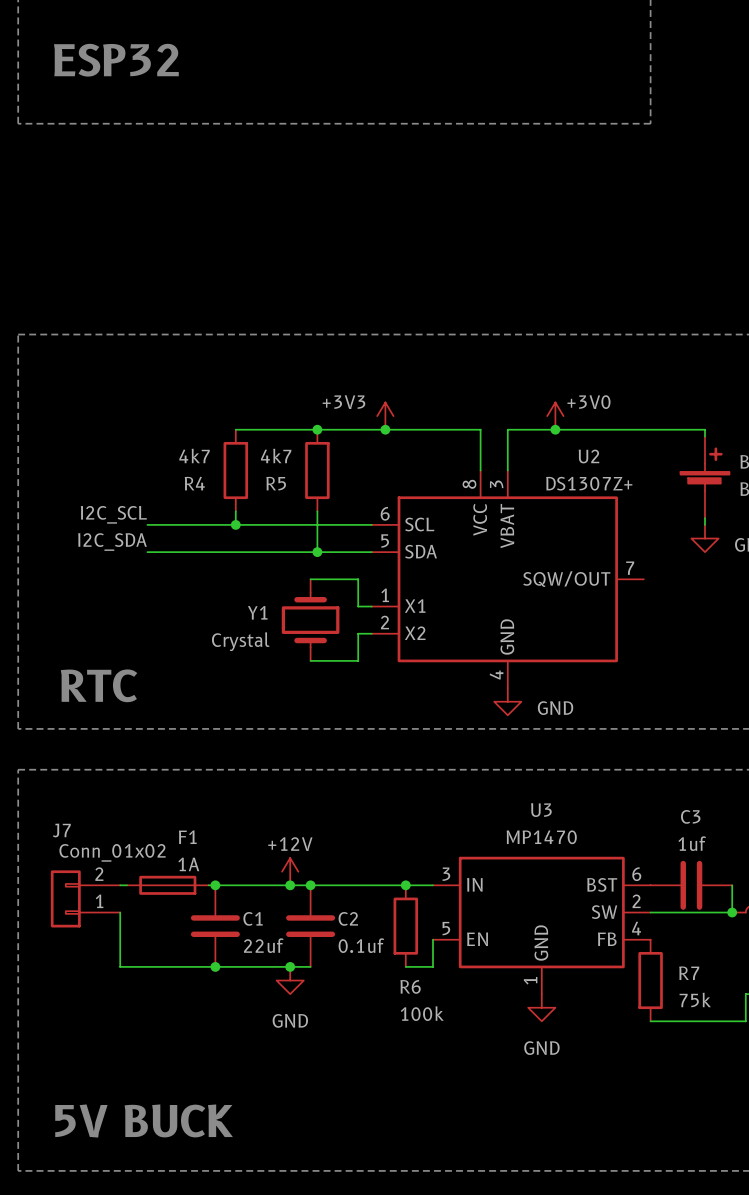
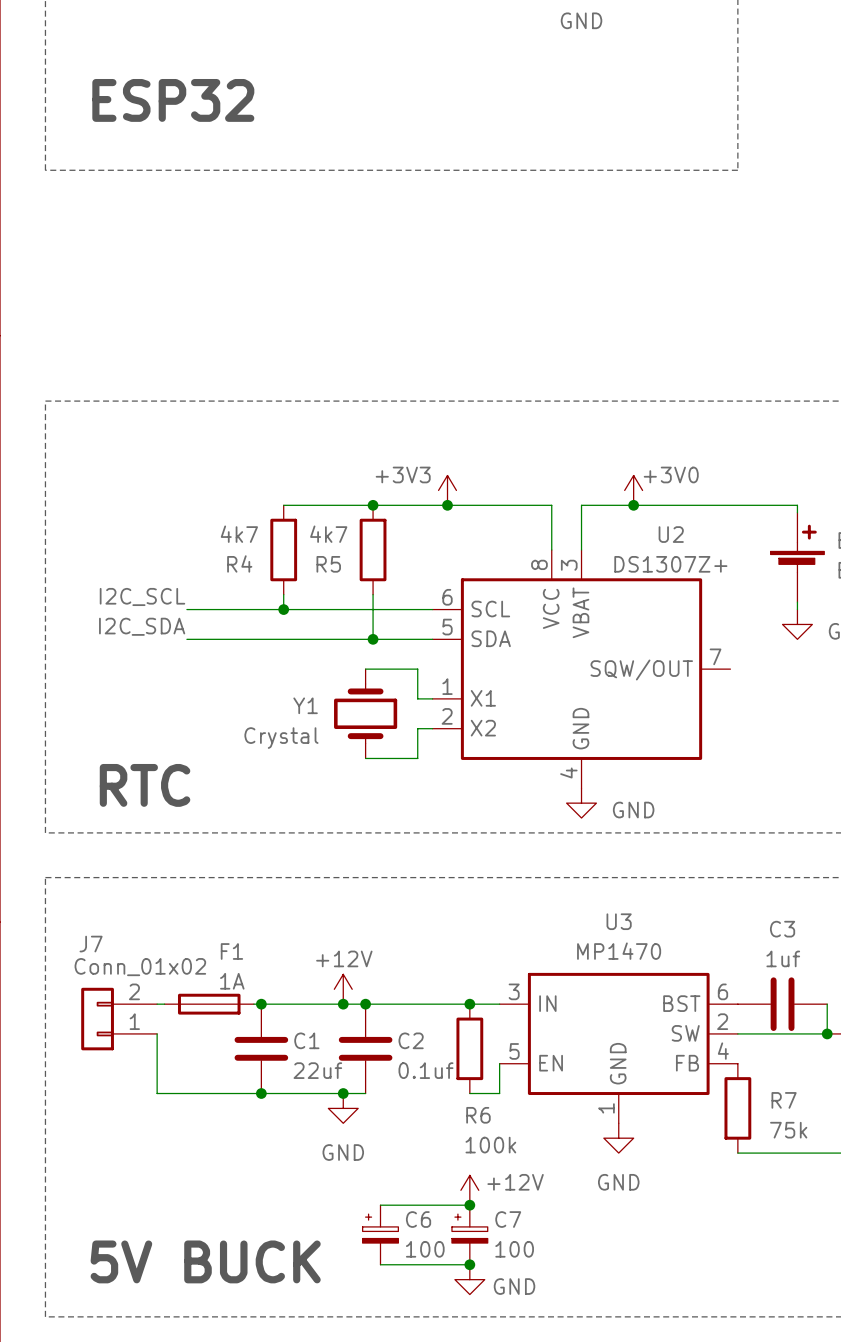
power symbol: none -> +12V (469, 1190)
wire: none -> (380, 1205) (469, 1205)
junction: none -> (469, 1205)
C6: none -> 100 (380, 1234)
C7: none -> 100 (469, 1234)
wire: none -> (380, 1264) (469, 1264)
junction: none -> (469, 1264)
power symbol: none -> GND (469, 1279)

